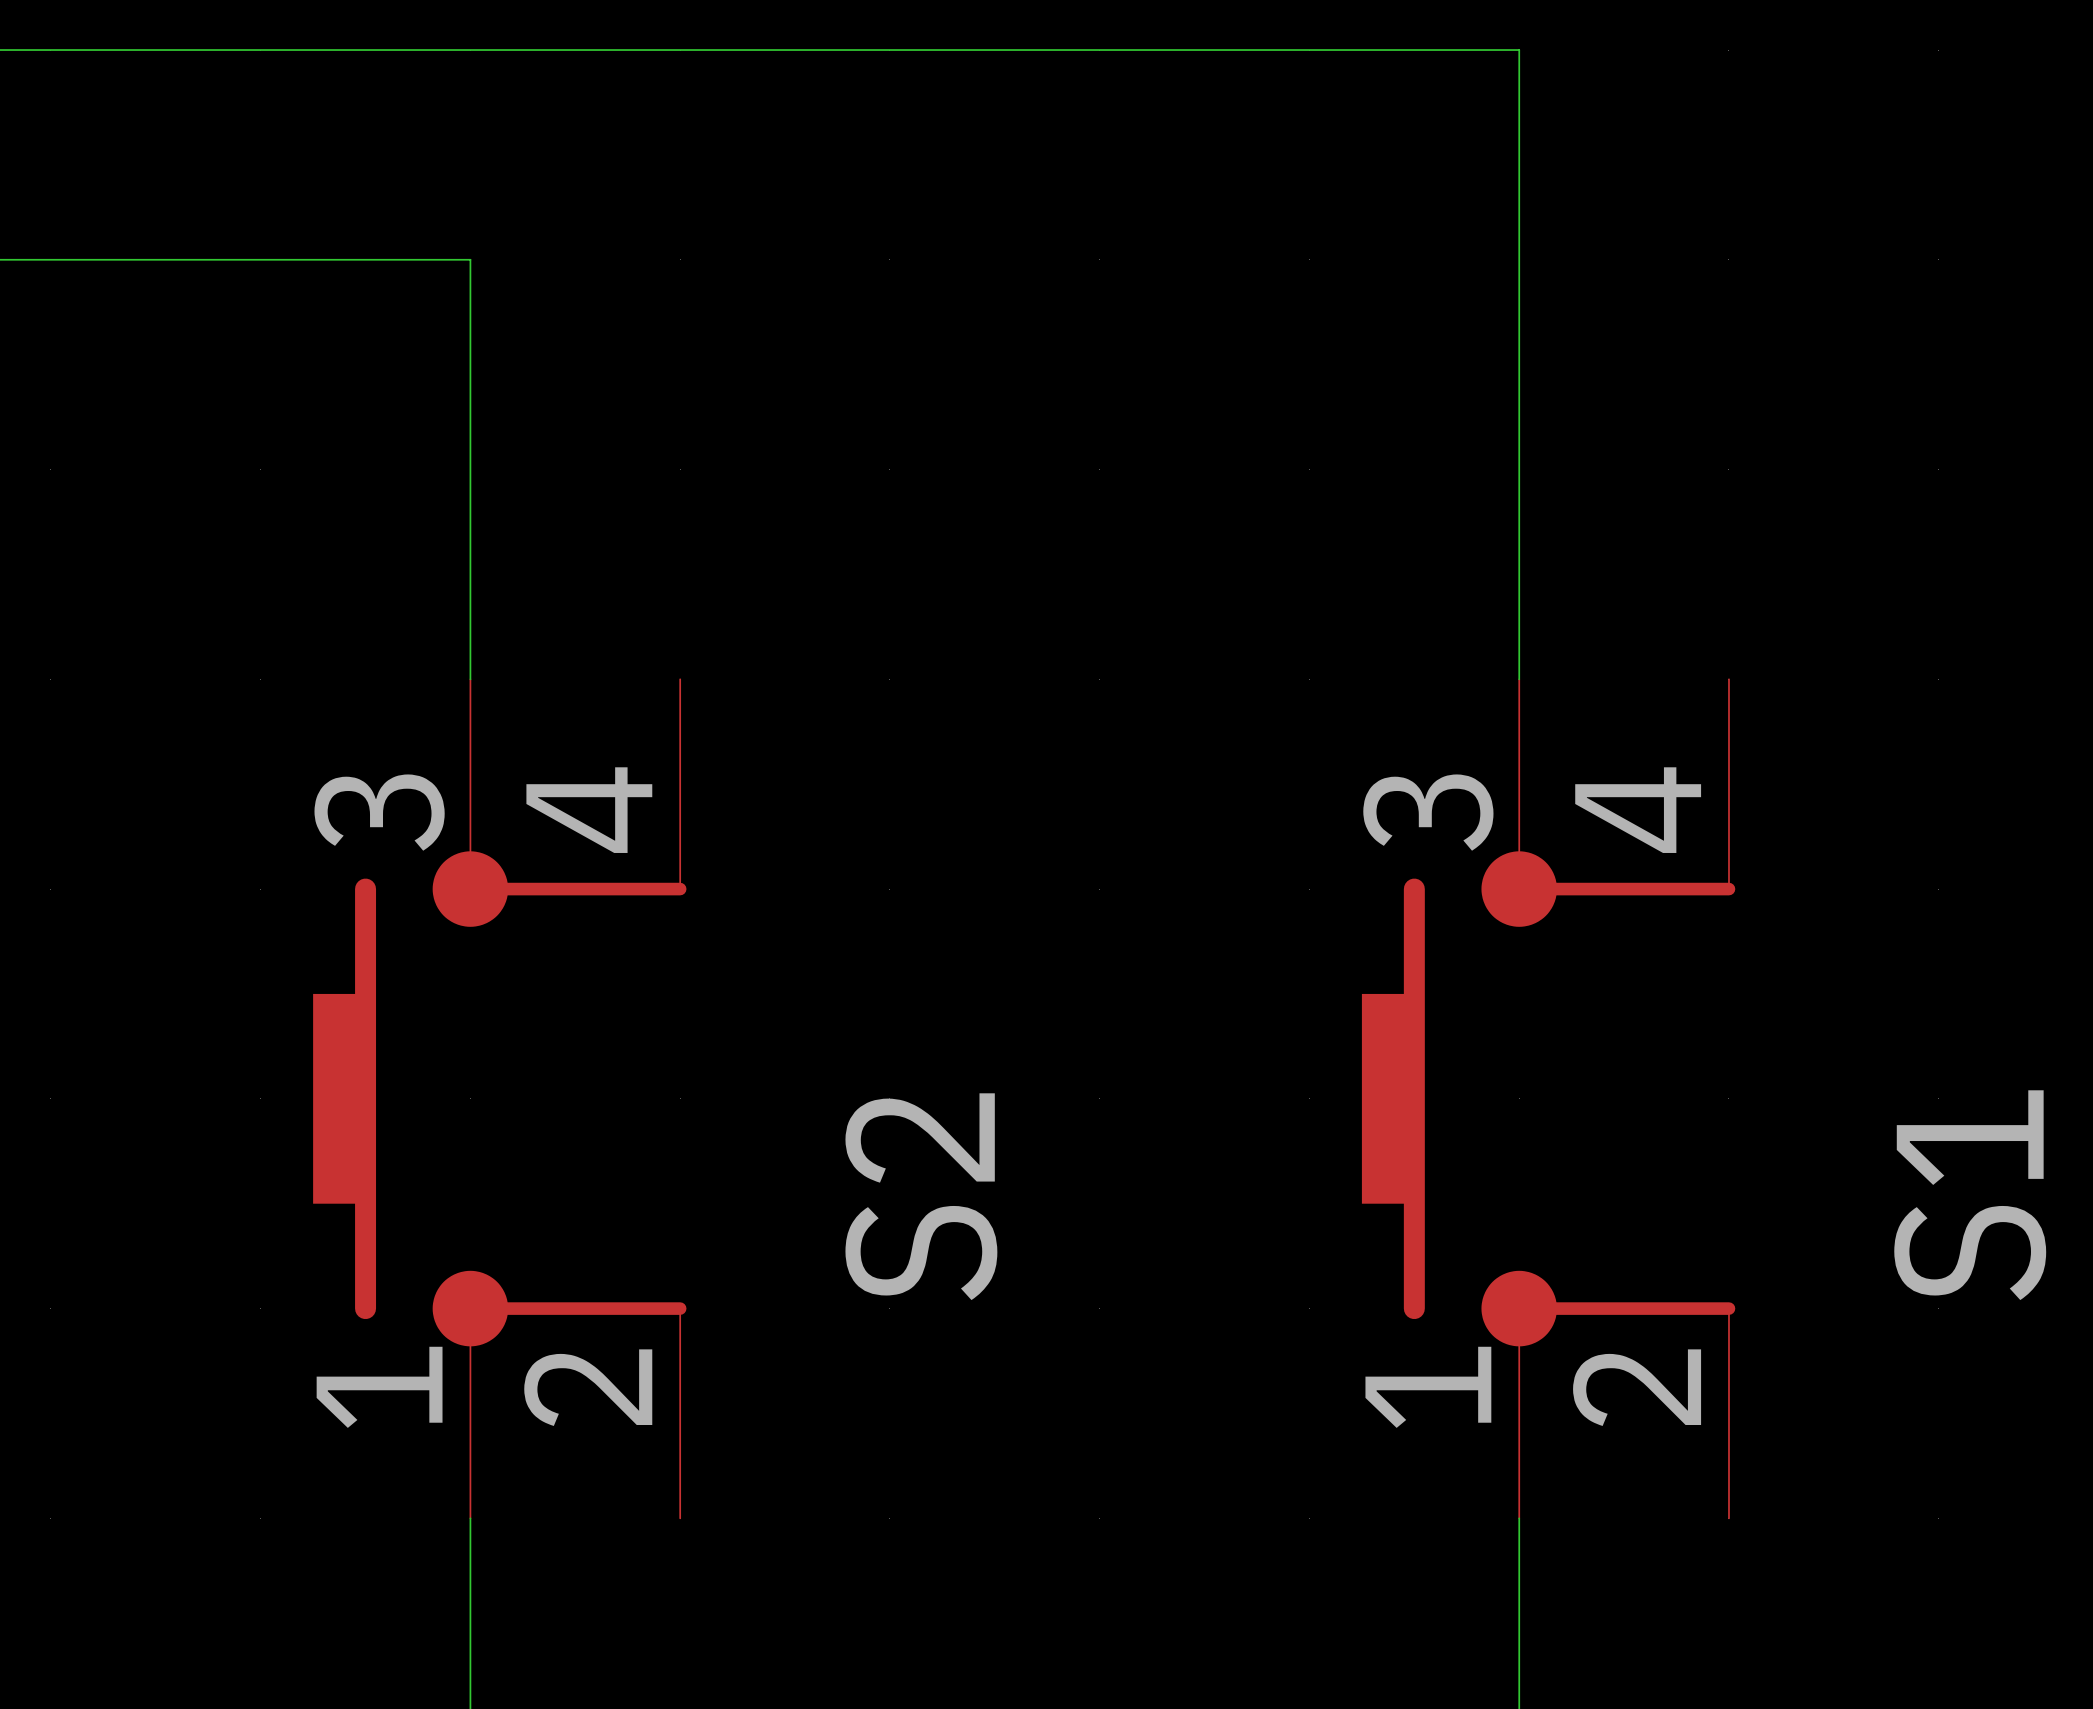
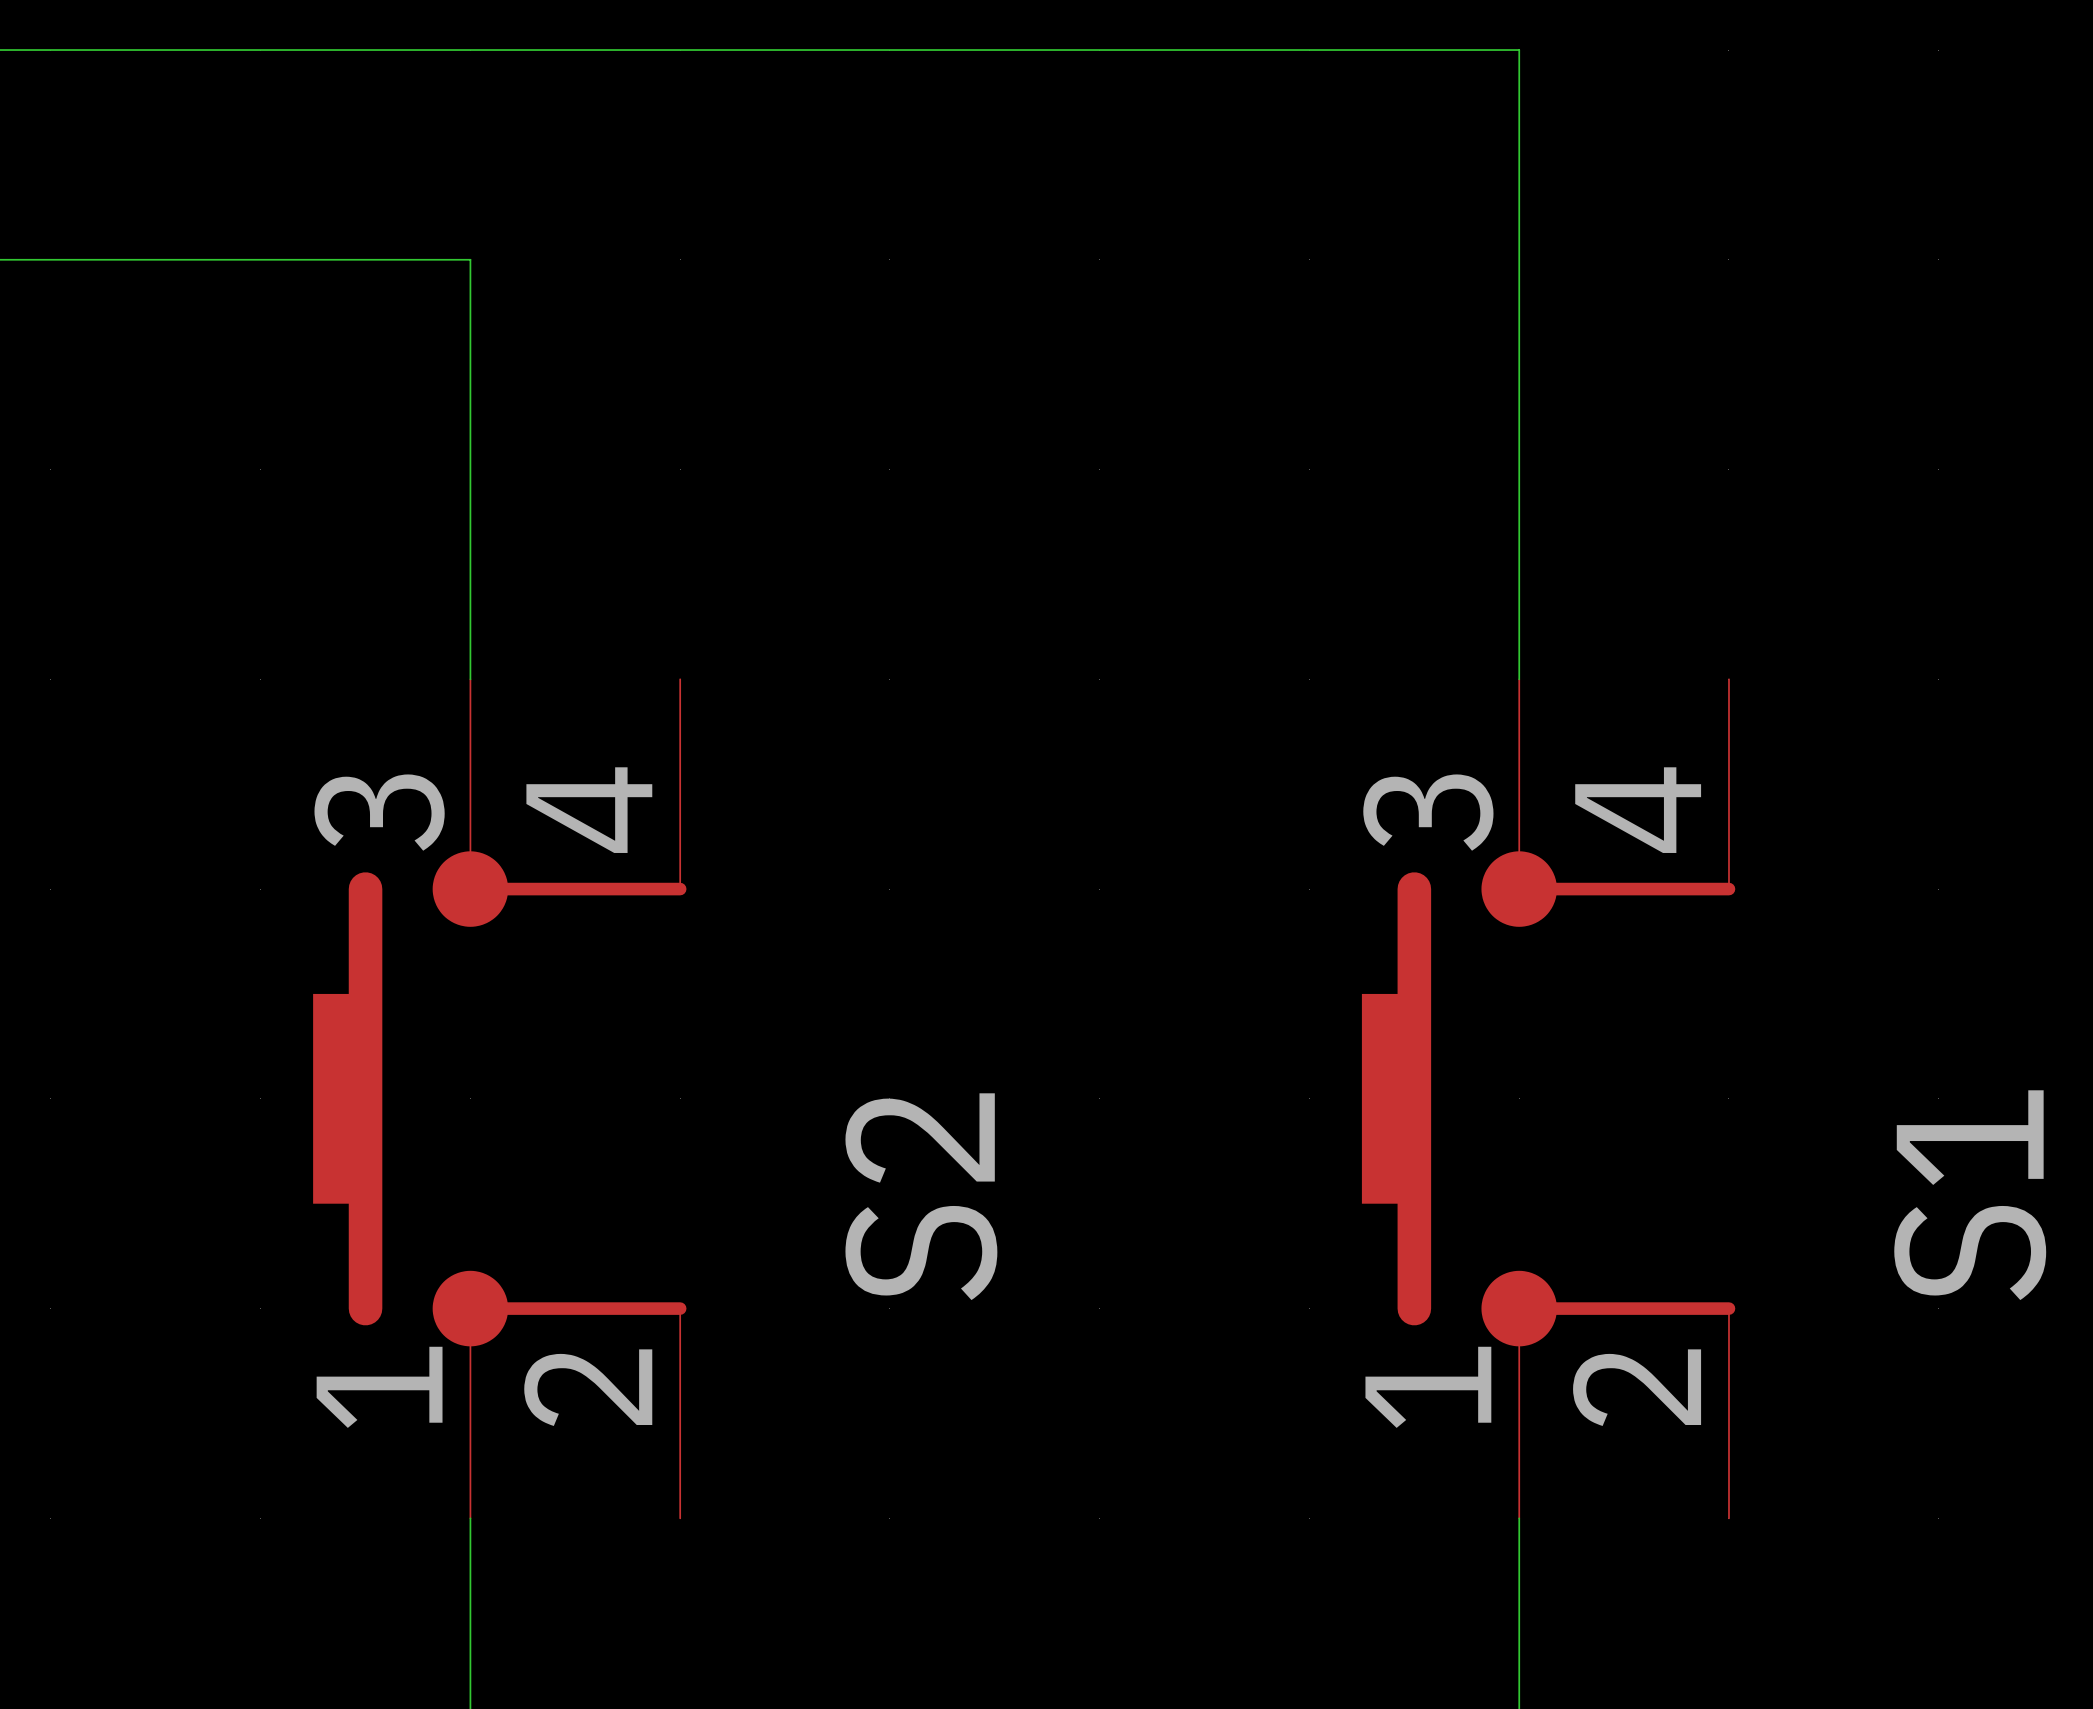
part symbol: [313, 679, 687, 1519] -> [313, 679, 687, 1519]
S2 symbol: [1361, 679, 1736, 1519] -> [1361, 679, 1736, 1519]

